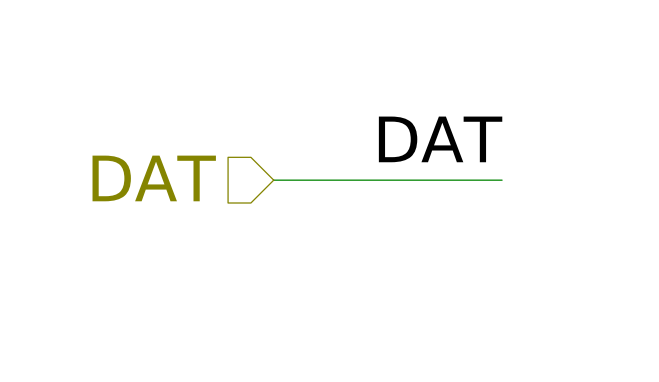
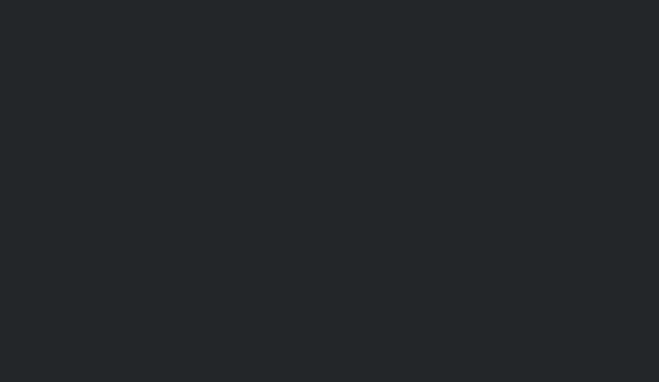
label: DAT (440, 139) -> none
hierarchical label: DAT (154, 178) -> none
wire: (273, 180) (502, 180) -> none

